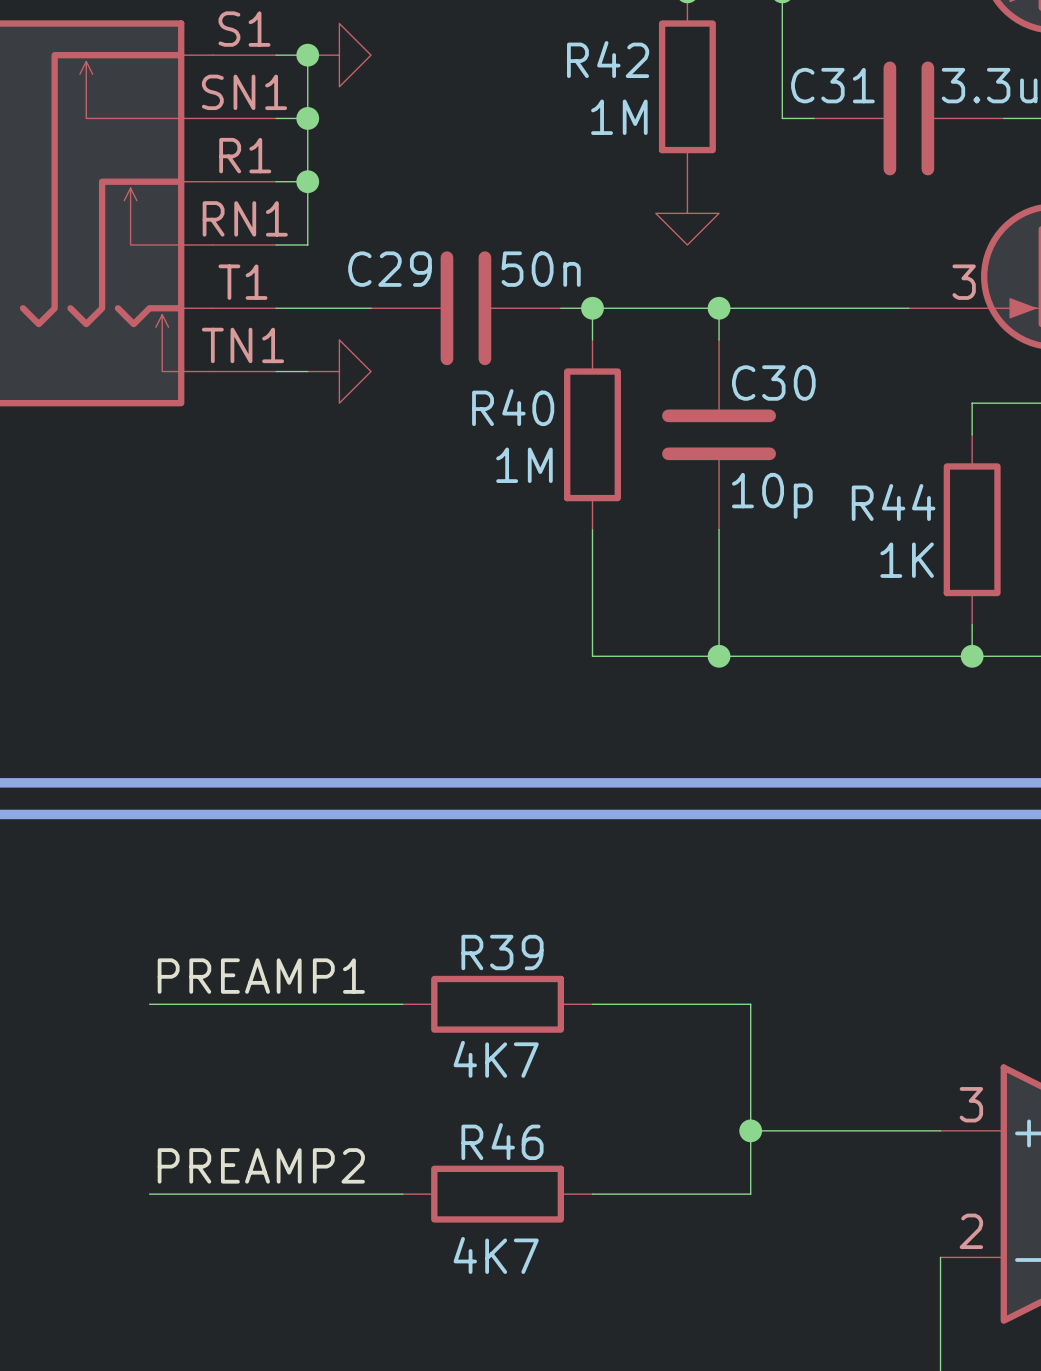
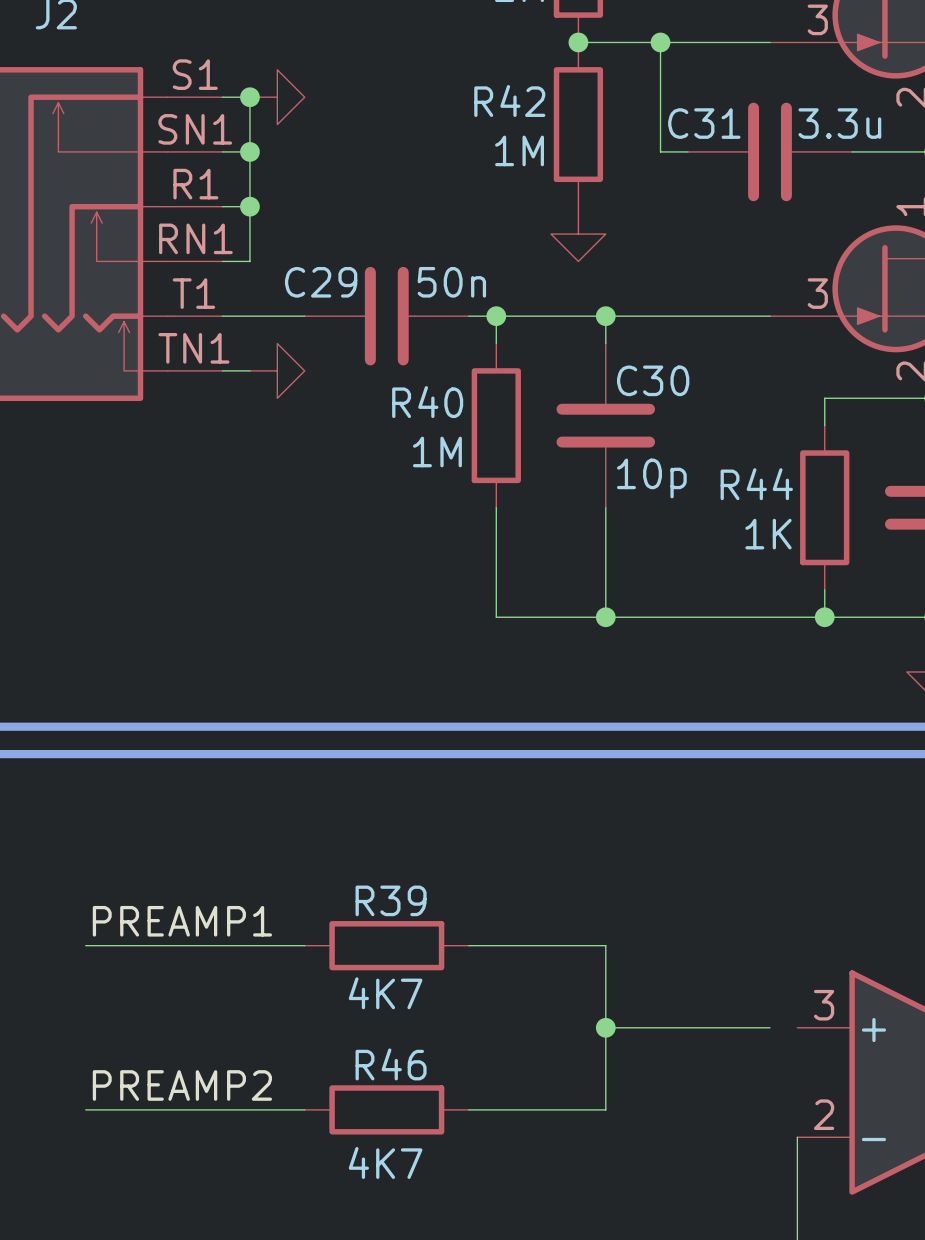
label position: PREAMP1 (261, 976) -> PREAMP1 (182, 921)
wire: (149, 1004) (402, 1004) -> (85, 945) (304, 945)
R39 position: (497, 1004) -> (386, 945)
wire: (592, 1004) (750, 1004) (750, 1194) (592, 1194) -> (468, 945) (605, 945) (605, 1109) (468, 1109)
junction position: (750, 1130) -> (605, 1027)
wire: (908, 1130) (940, 1130) -> (605, 1027) (633, 1027)
label position: PREAMP2 (261, 1165) -> PREAMP2 (182, 1085)
wire: (149, 1194) (402, 1194) -> (85, 1109) (304, 1109)
R46 position: (497, 1194) -> (386, 1109)

